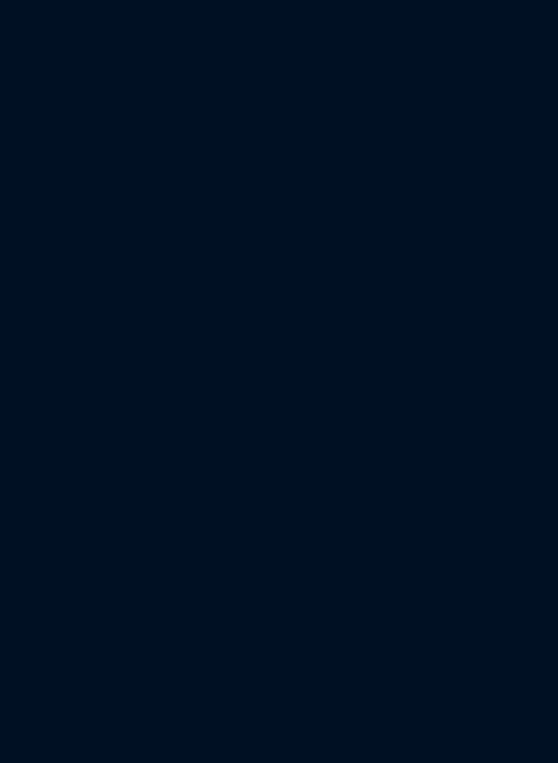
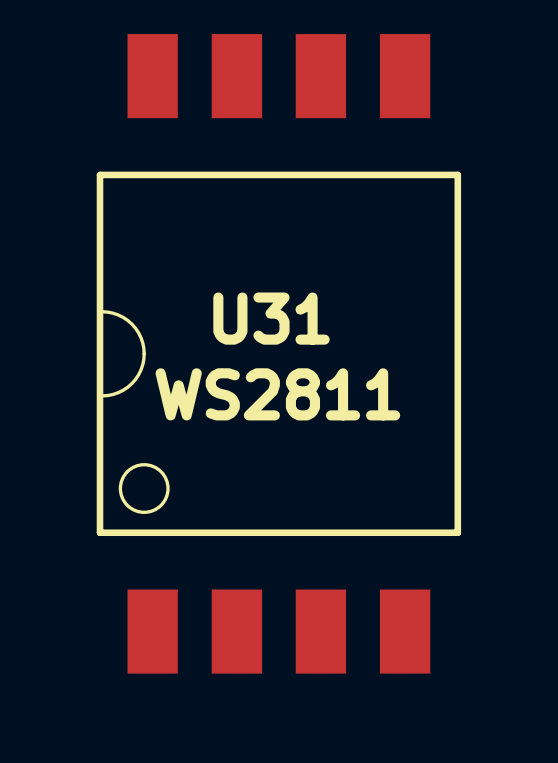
U31: none -> WS2811 (278, 353)

